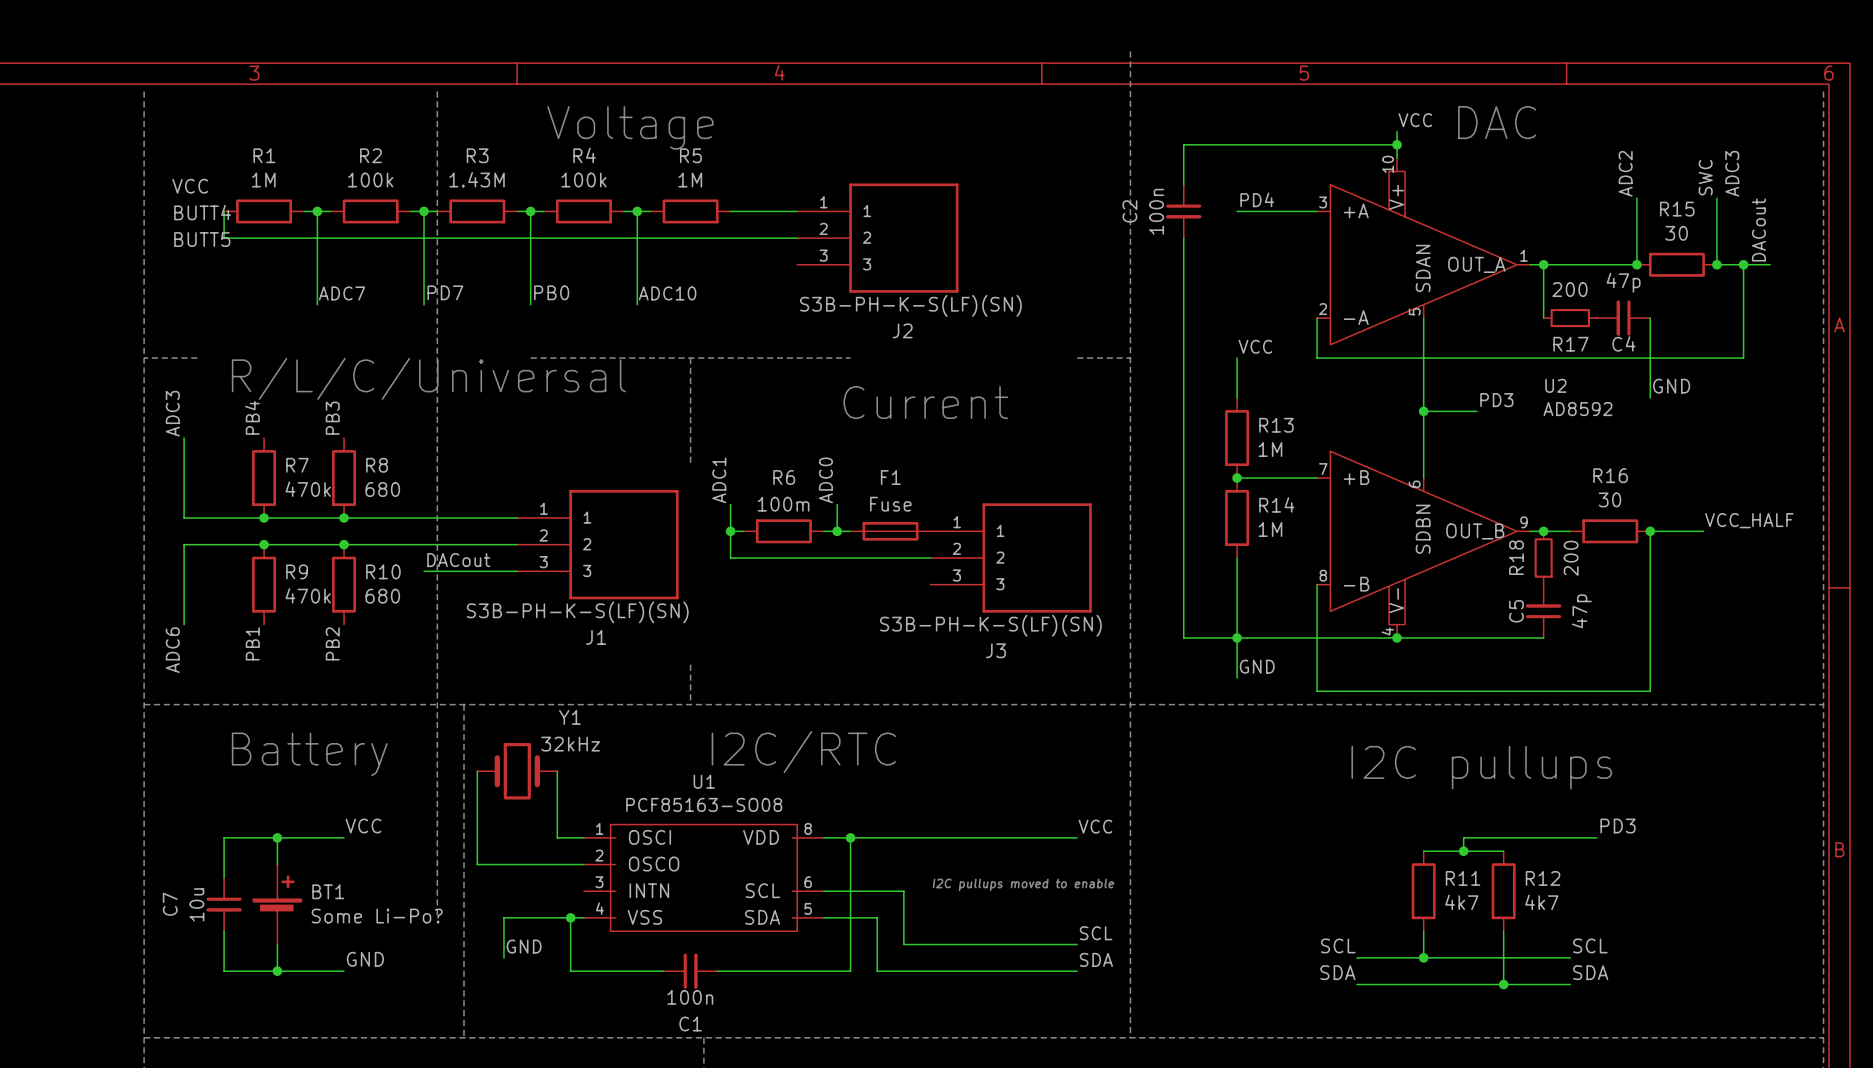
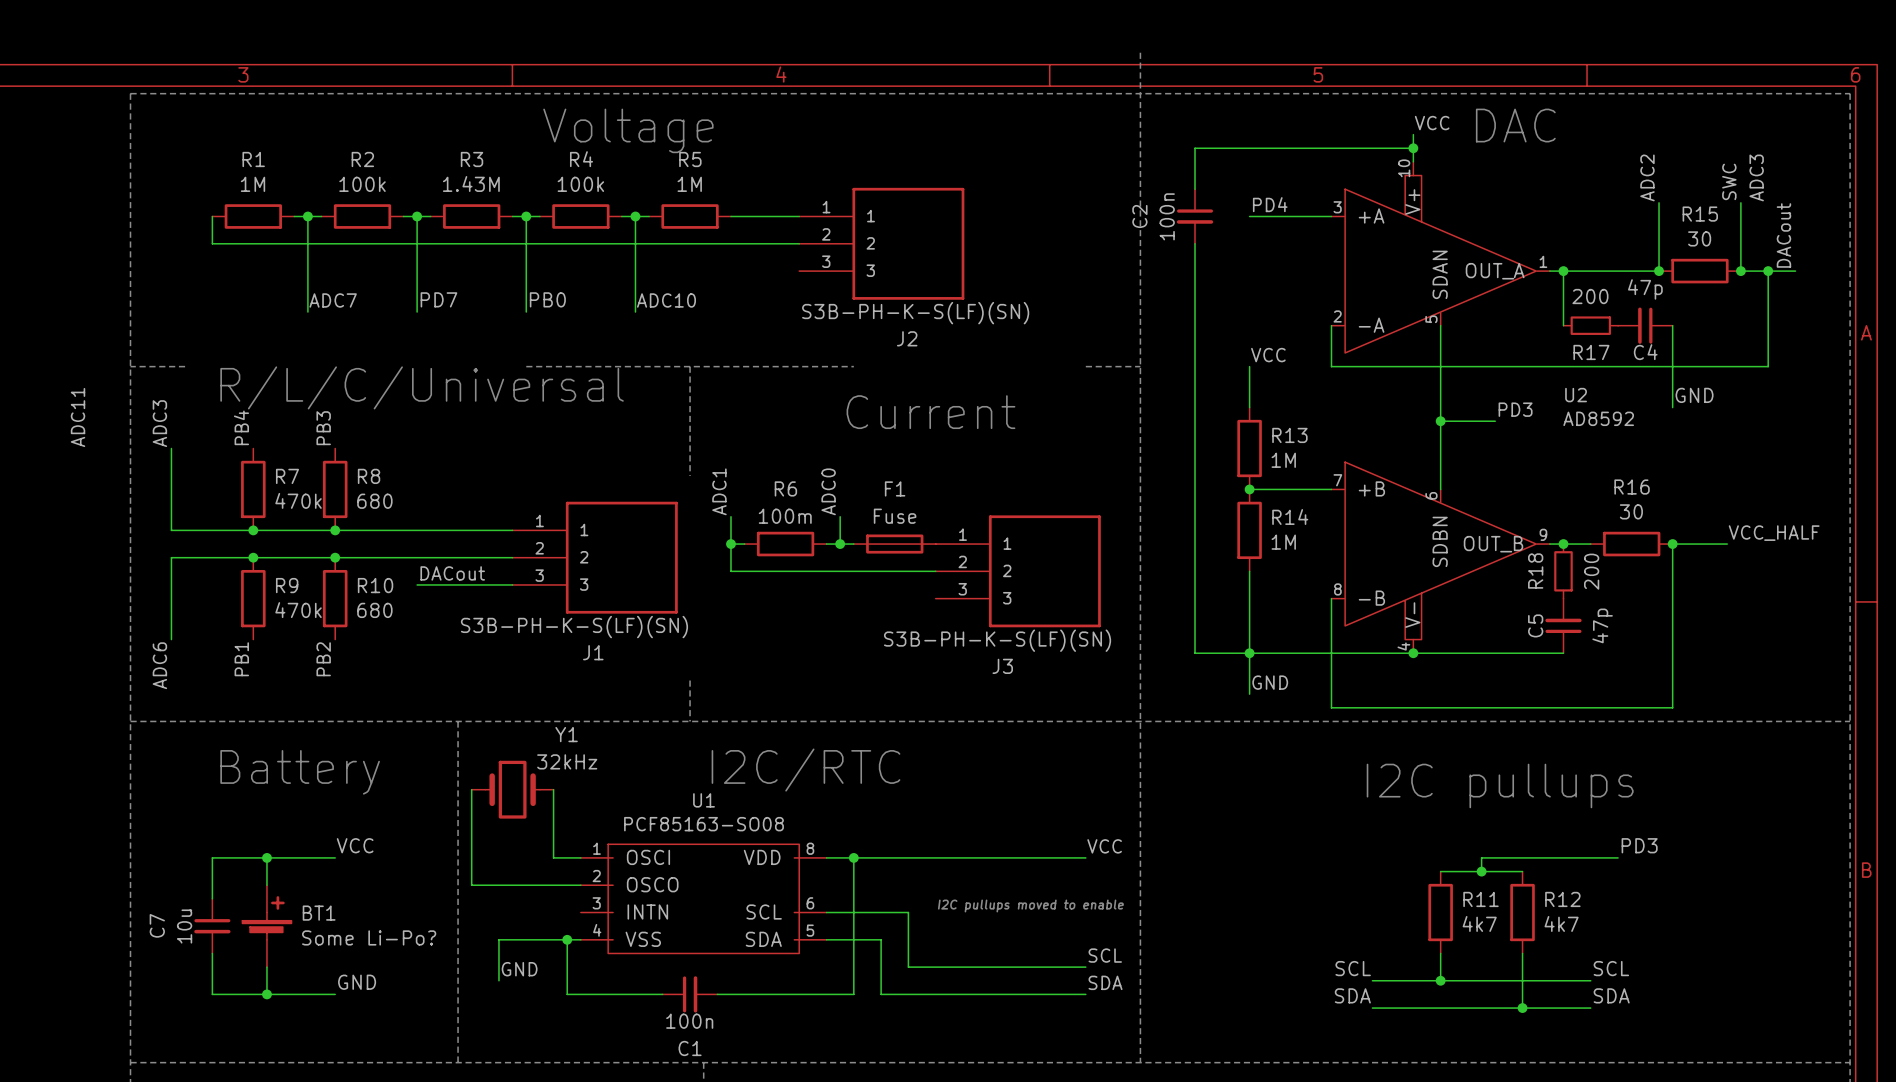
line: none -> (130, 93) (1850, 93)
line: (437, 91) (437, 917) -> none
label: VCC (190, 186) -> none
label: BUTT4 (202, 212) -> none
label: BUTT5 (202, 239) -> none
label: none -> ADC11 (78, 417)

